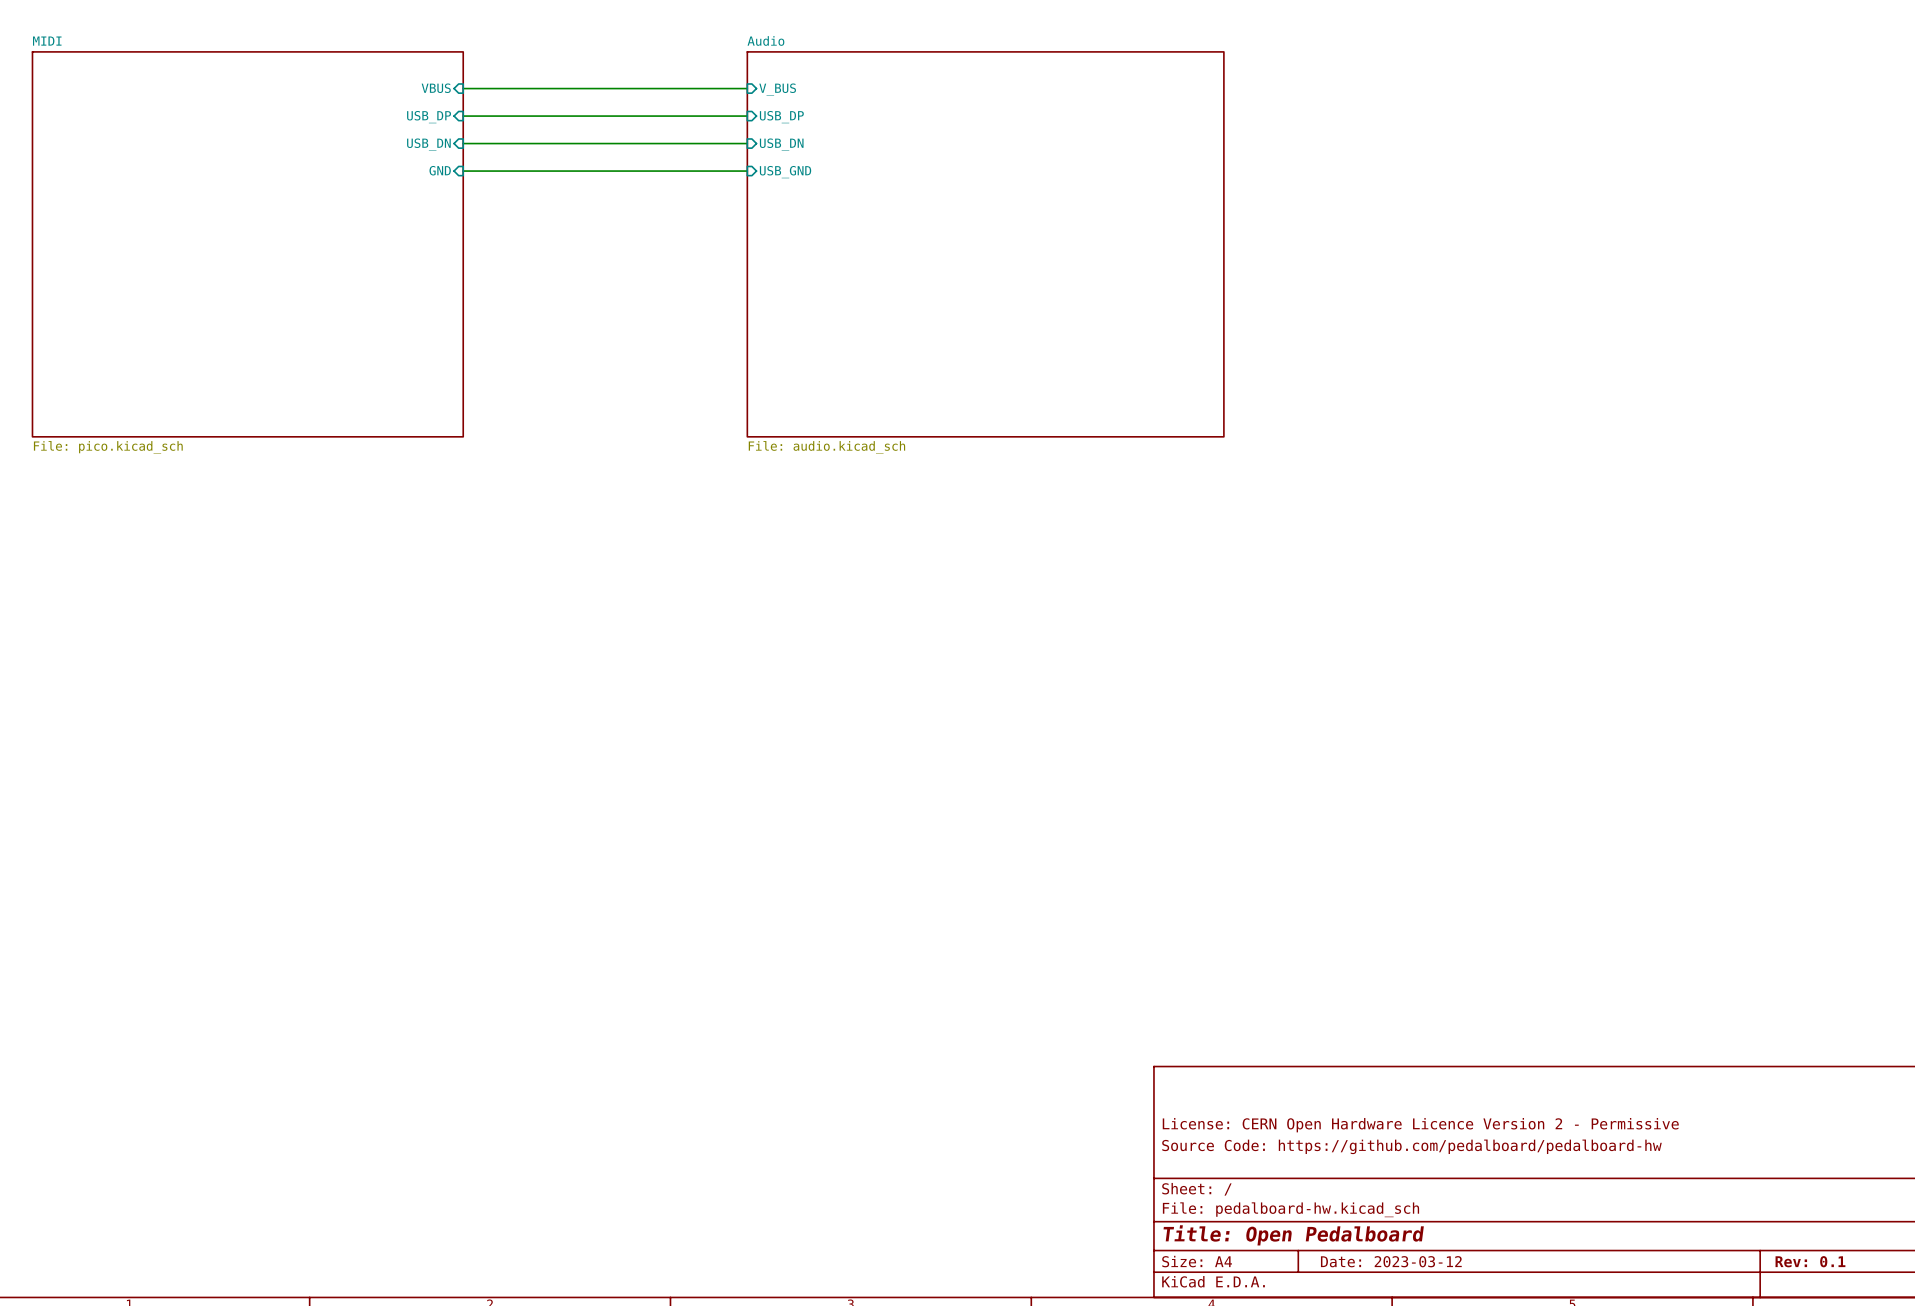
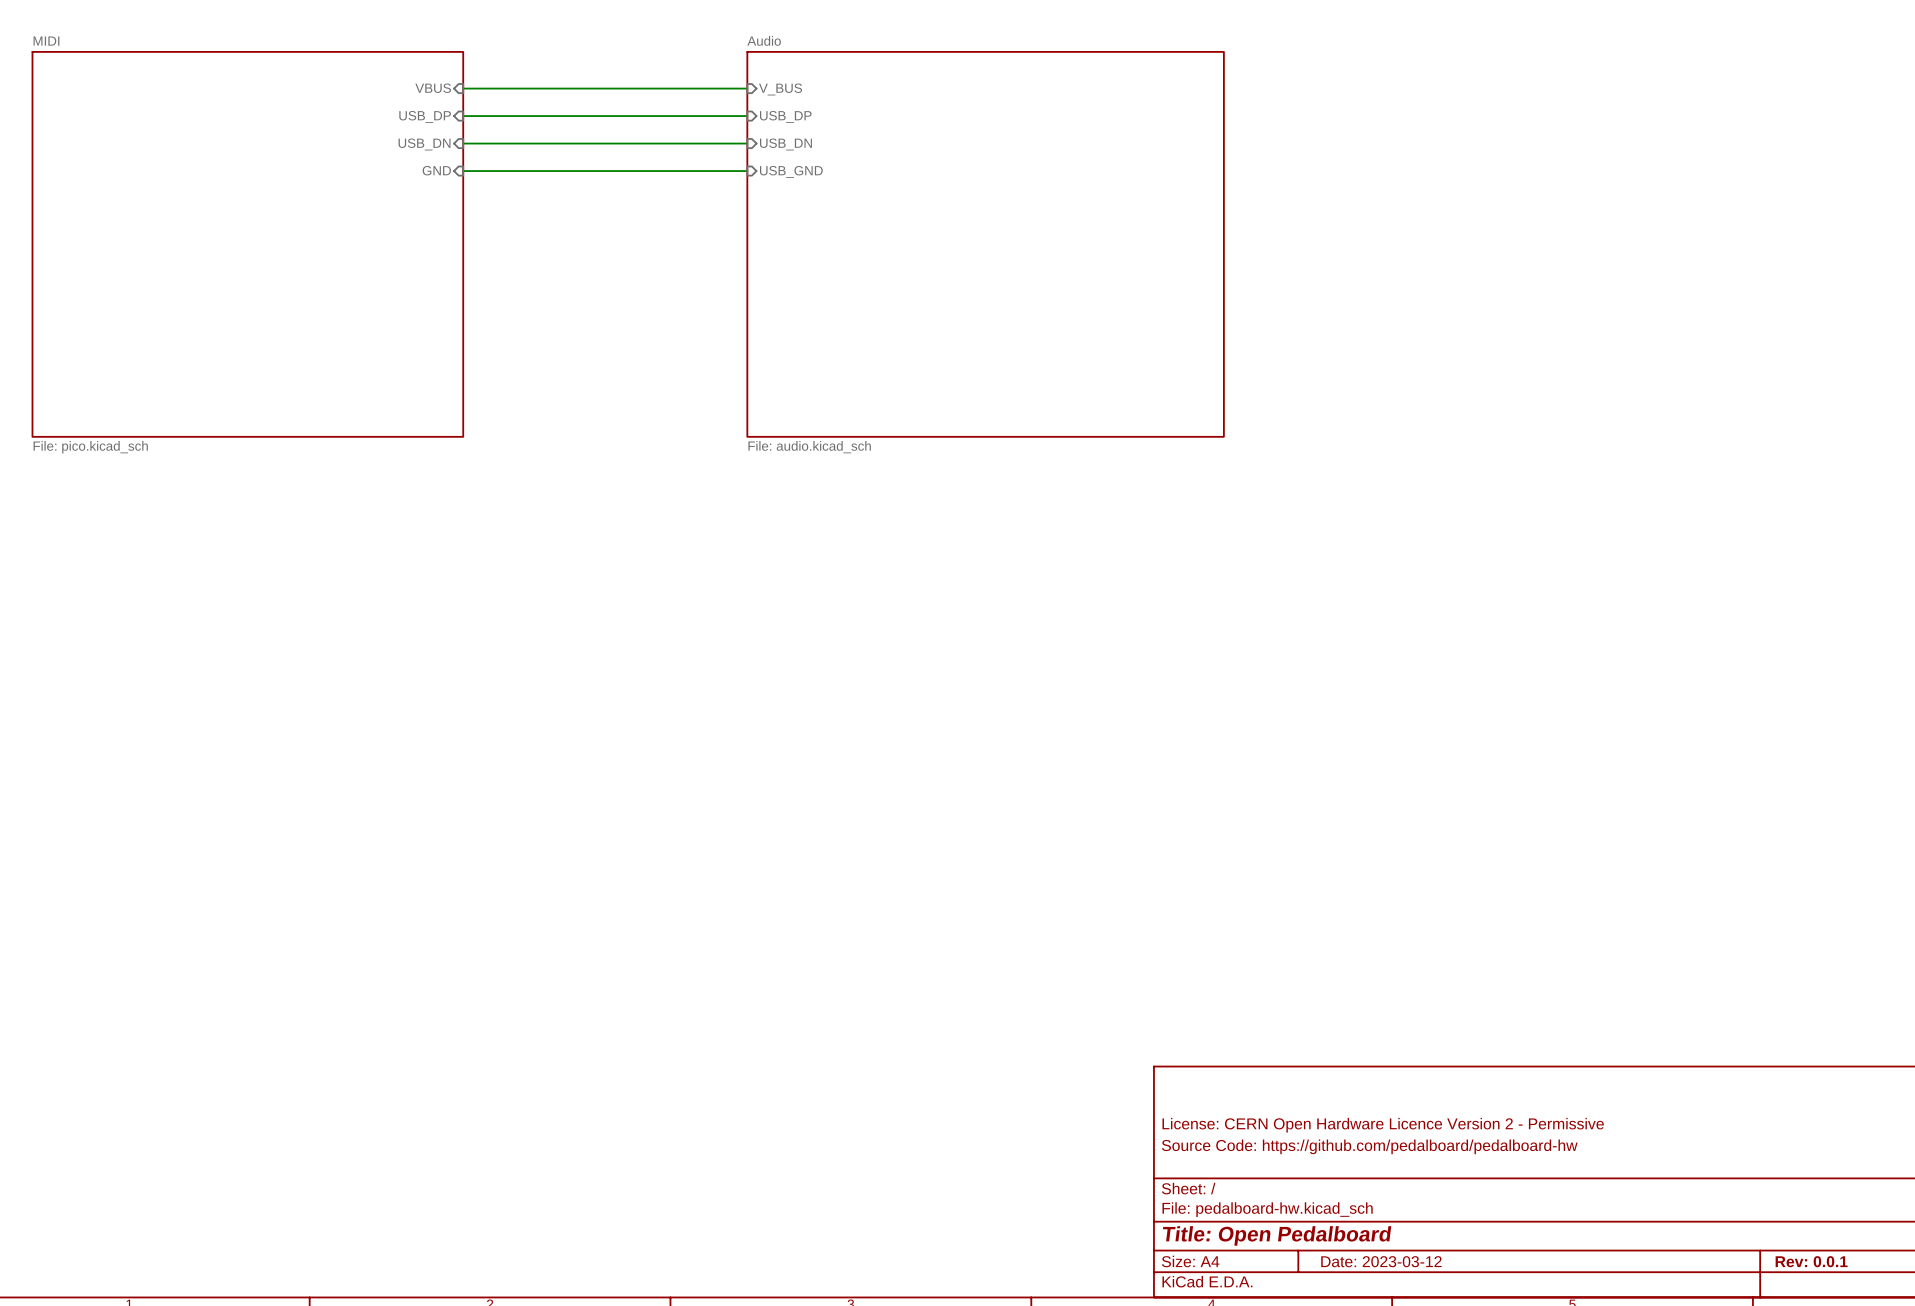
title block: Rev: 0.1 (1810, 1261) -> Rev: 0.0.1 (1811, 1261)

